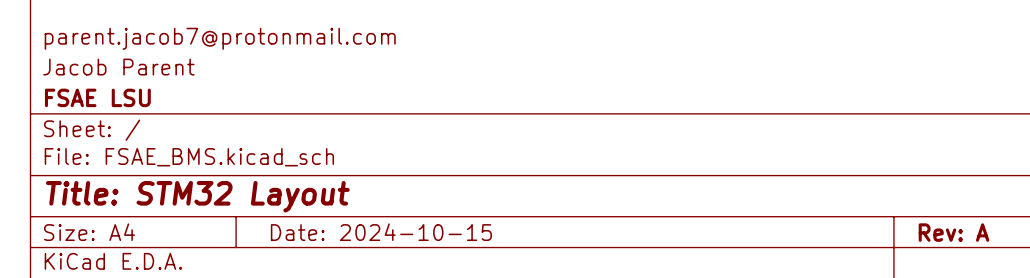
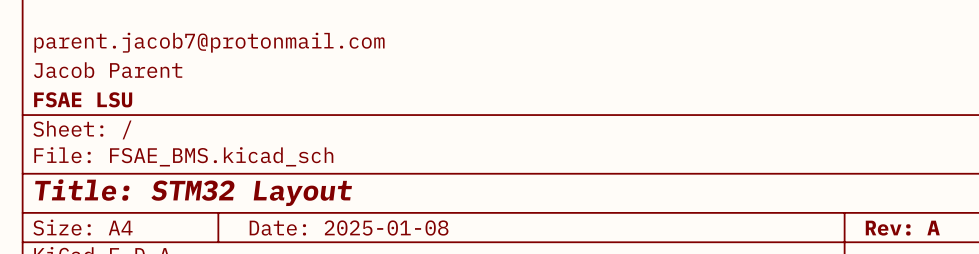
title block: Date: 2024-10-15 (381, 232) -> Date: 2025-01-08 (349, 228)

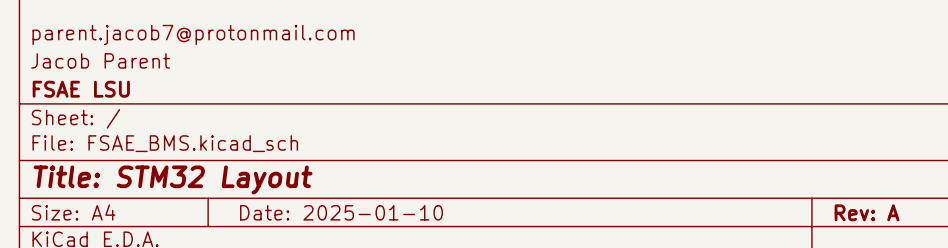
title block: Date: 2025-01-08 (349, 228) -> Date: 2025-01-10 (341, 212)

